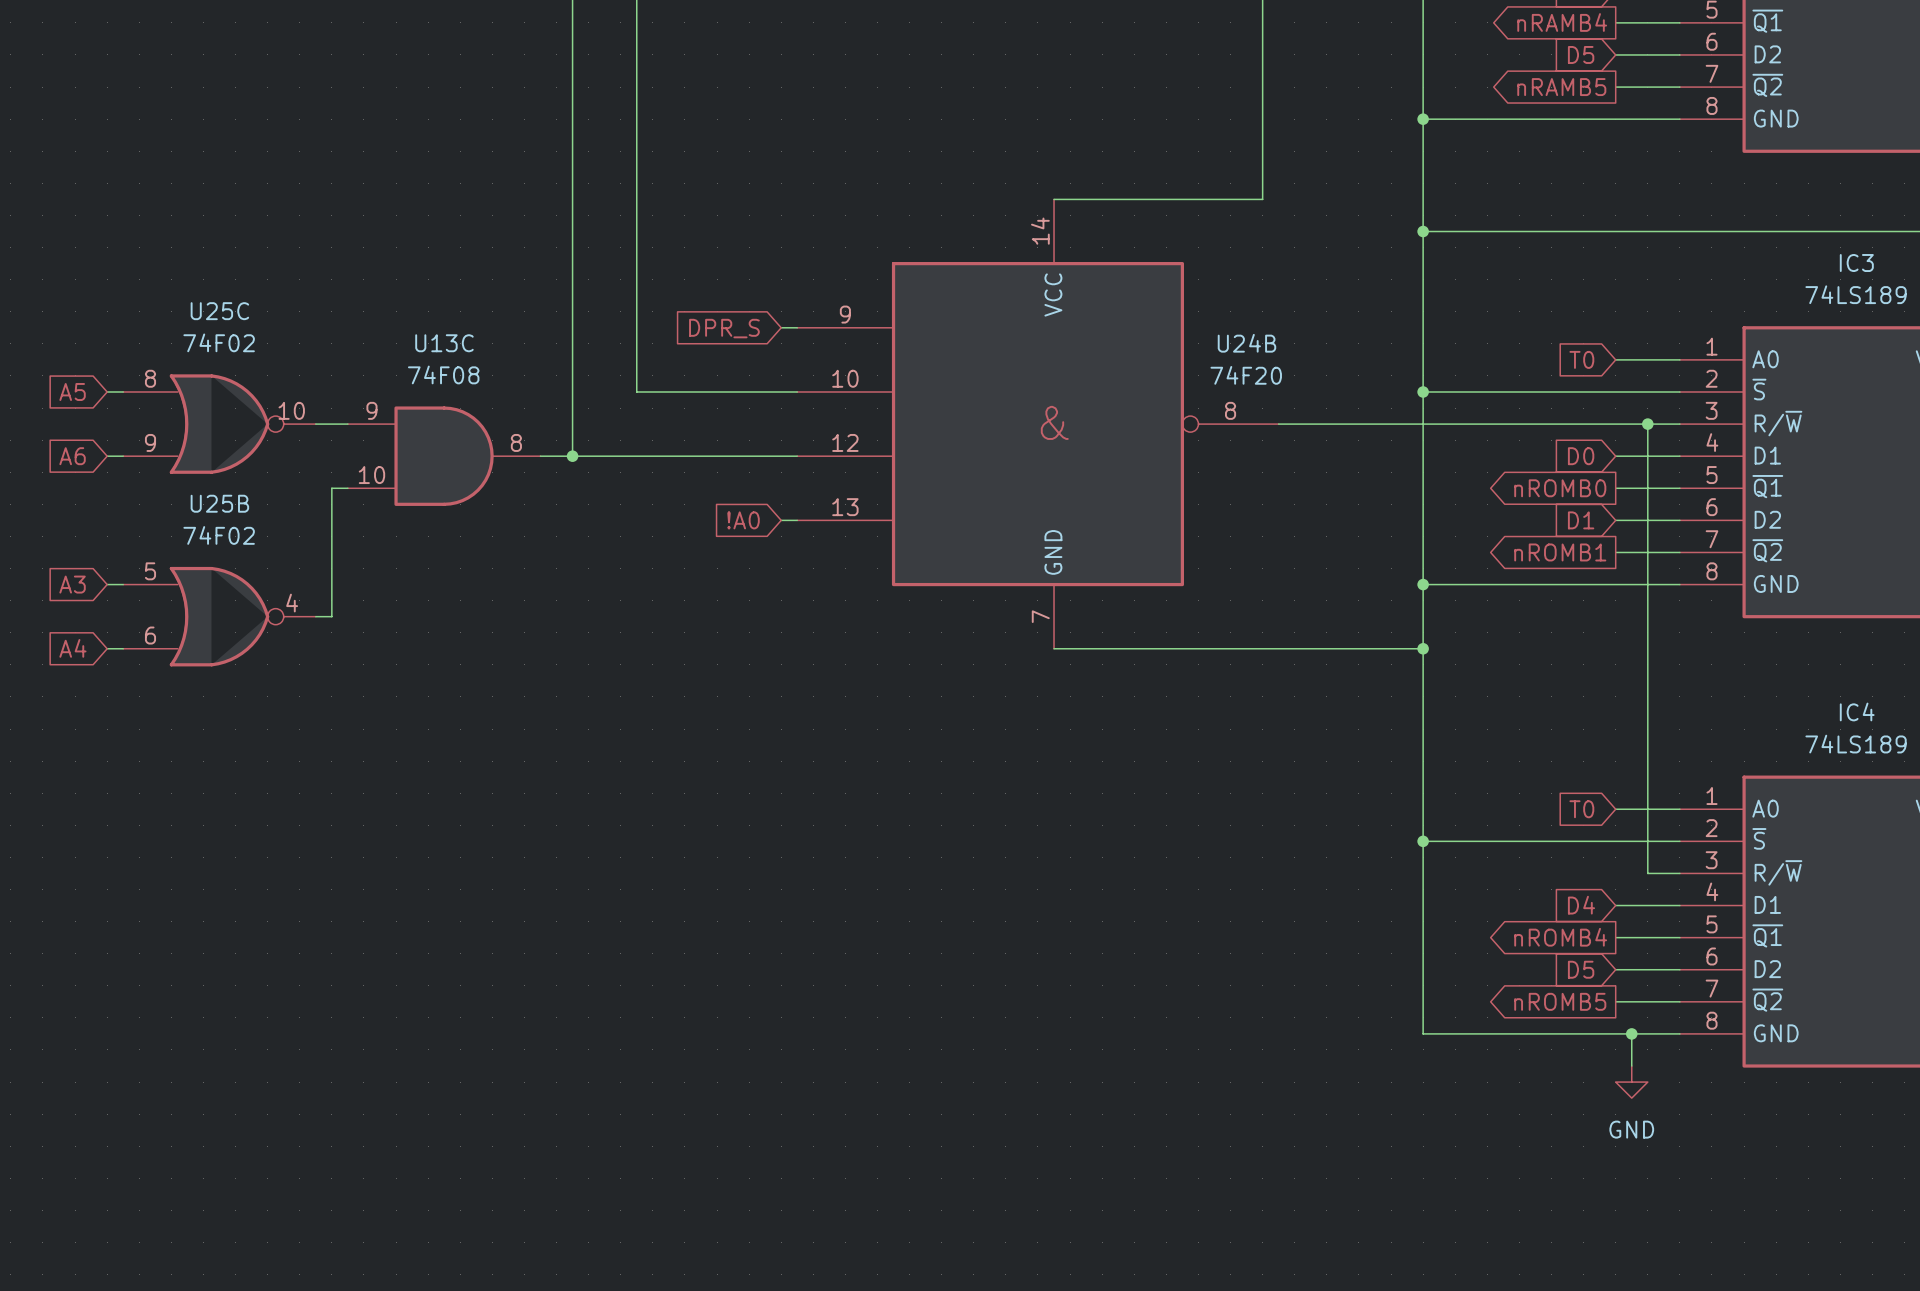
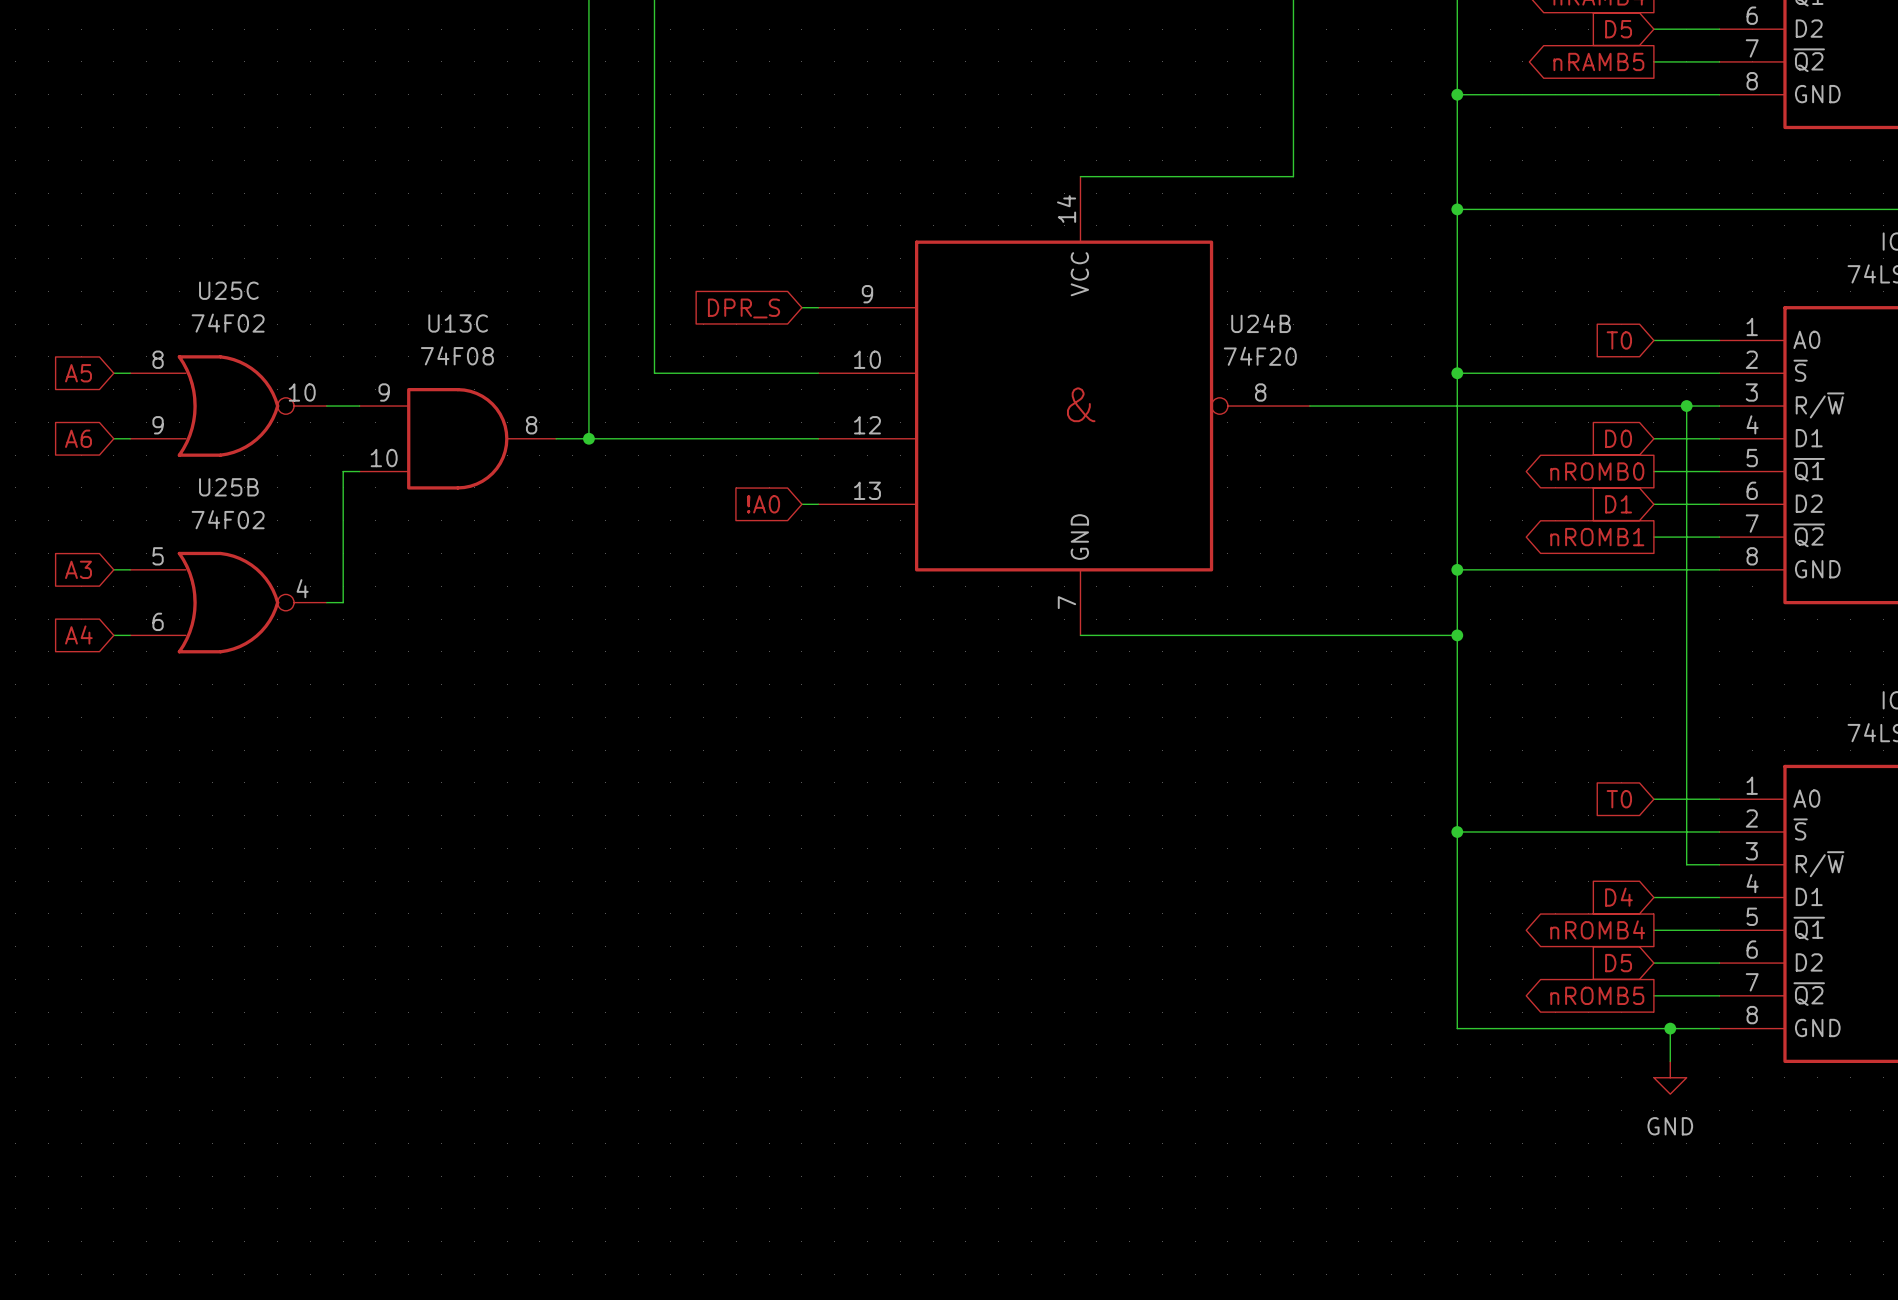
U24B name position: U24B (1246, 343) -> U24B (1261, 323)
U24B value position: 74F20 (1246, 375) -> 74F20 (1260, 356)

